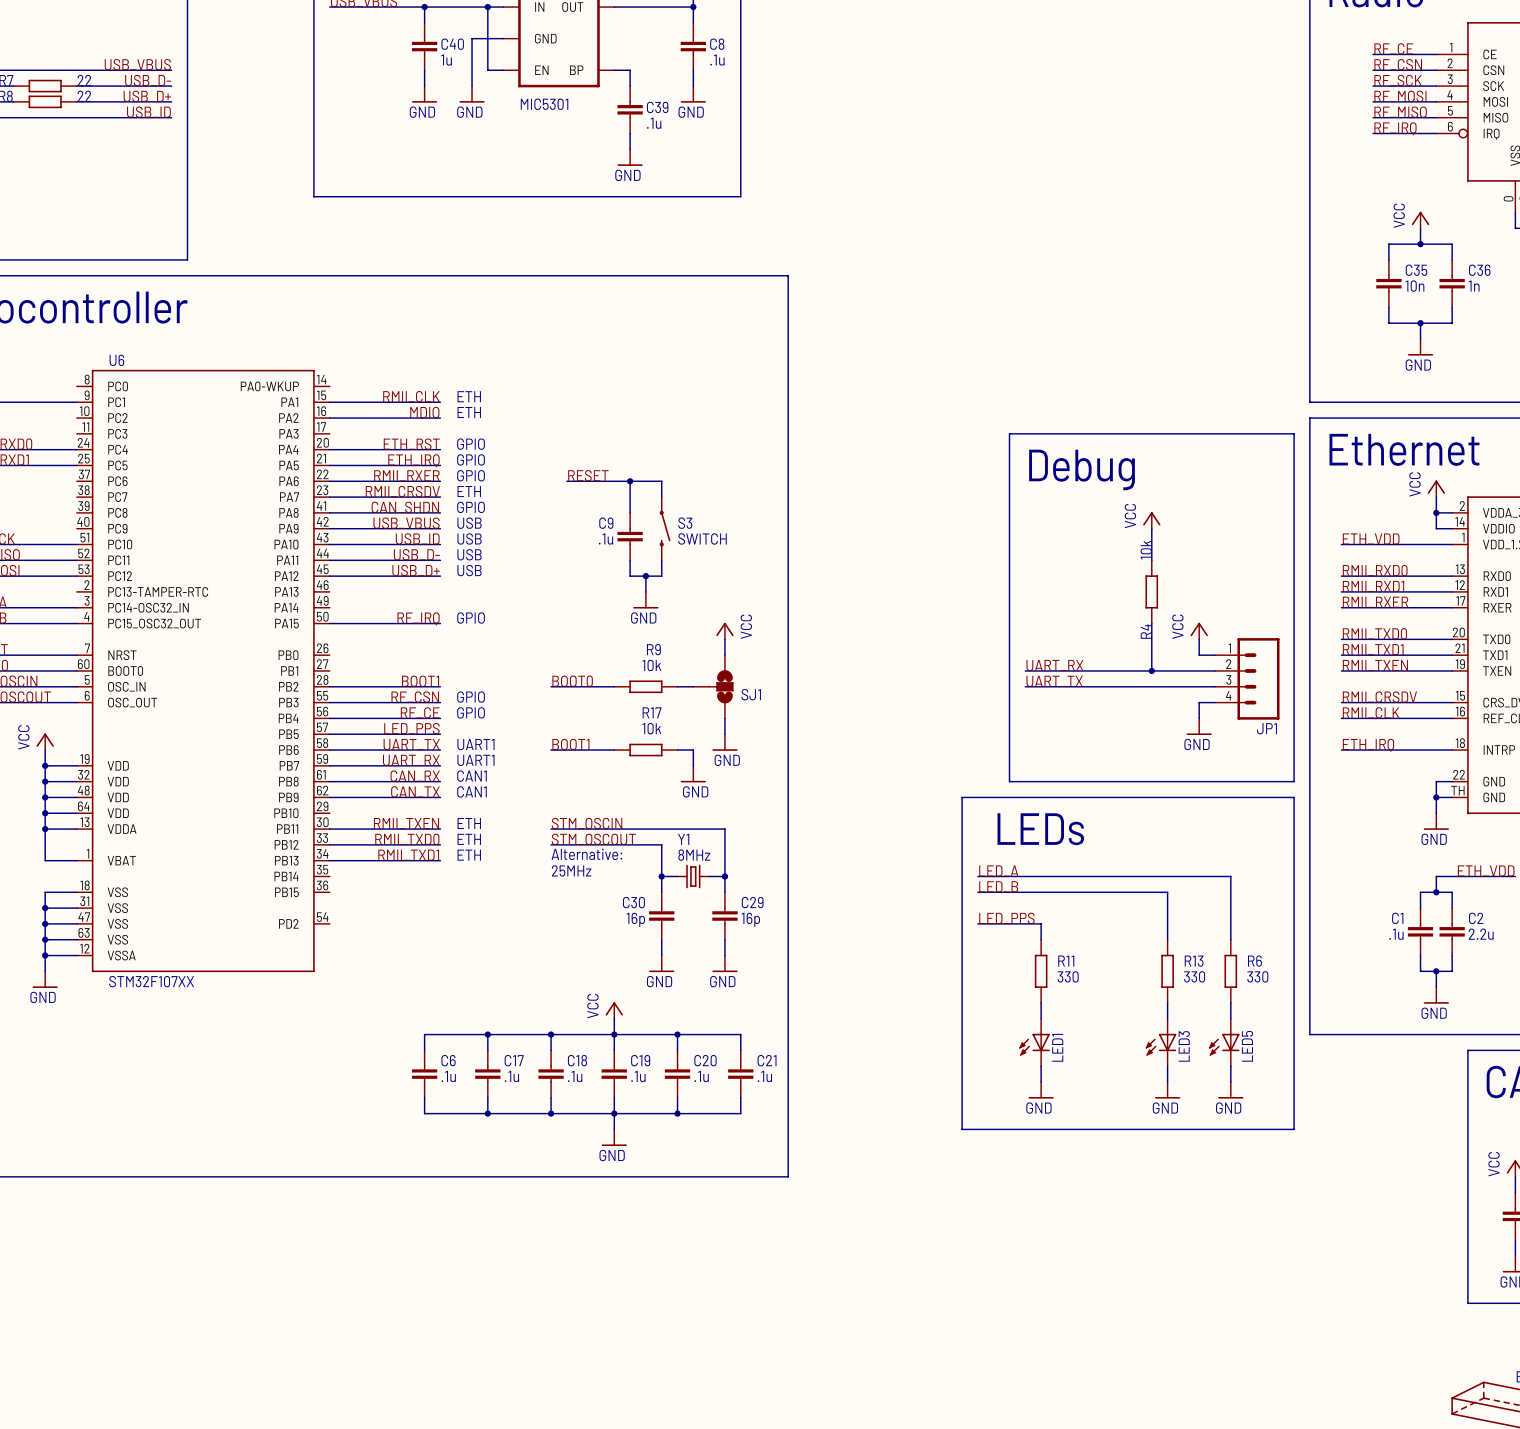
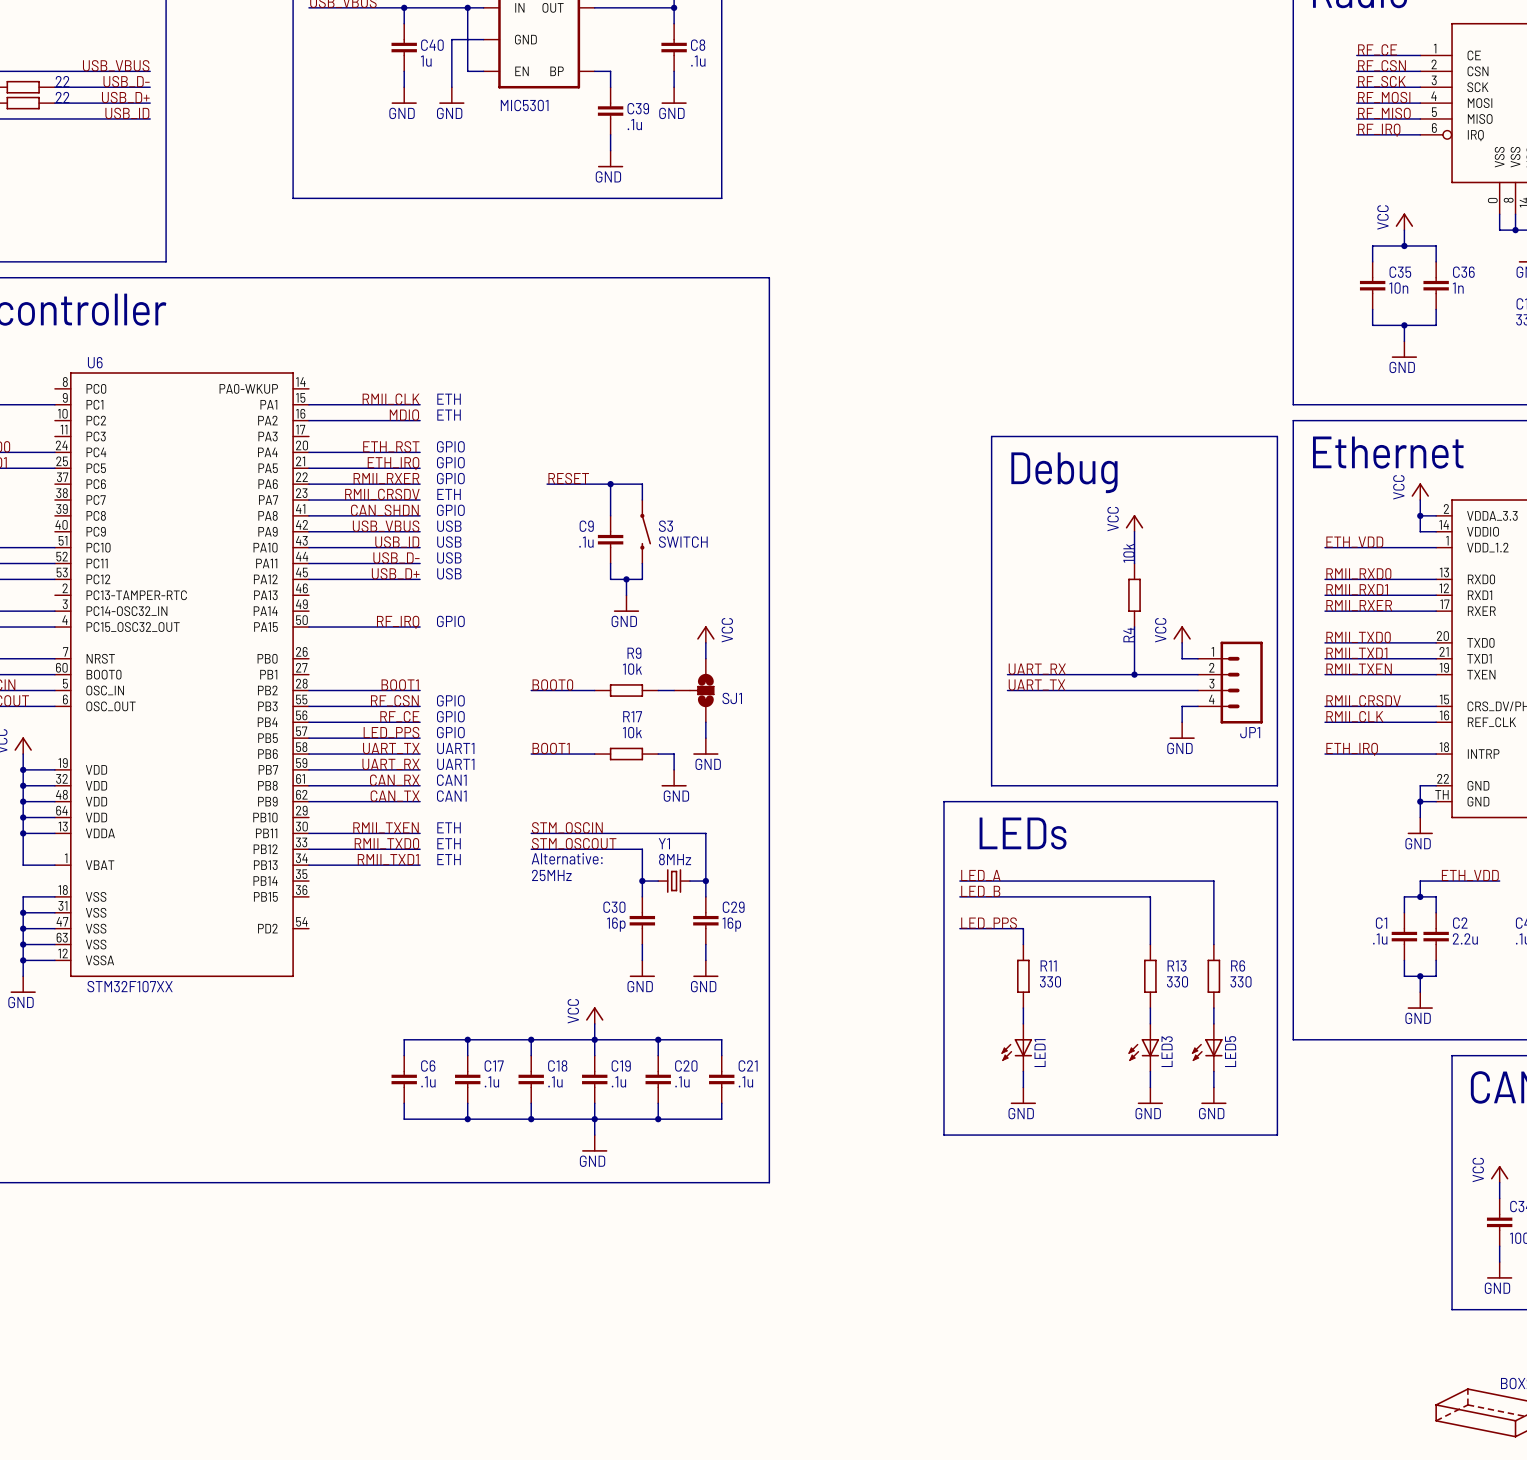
text: none -> GPIO (450, 732)

